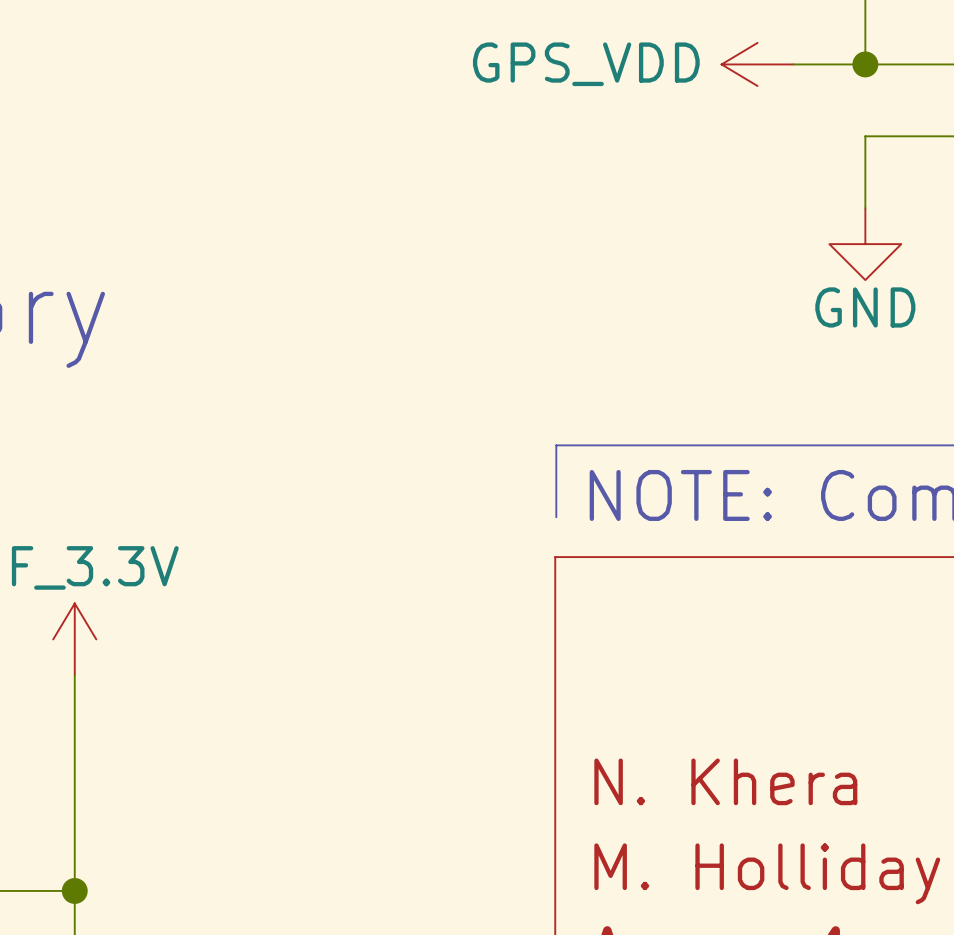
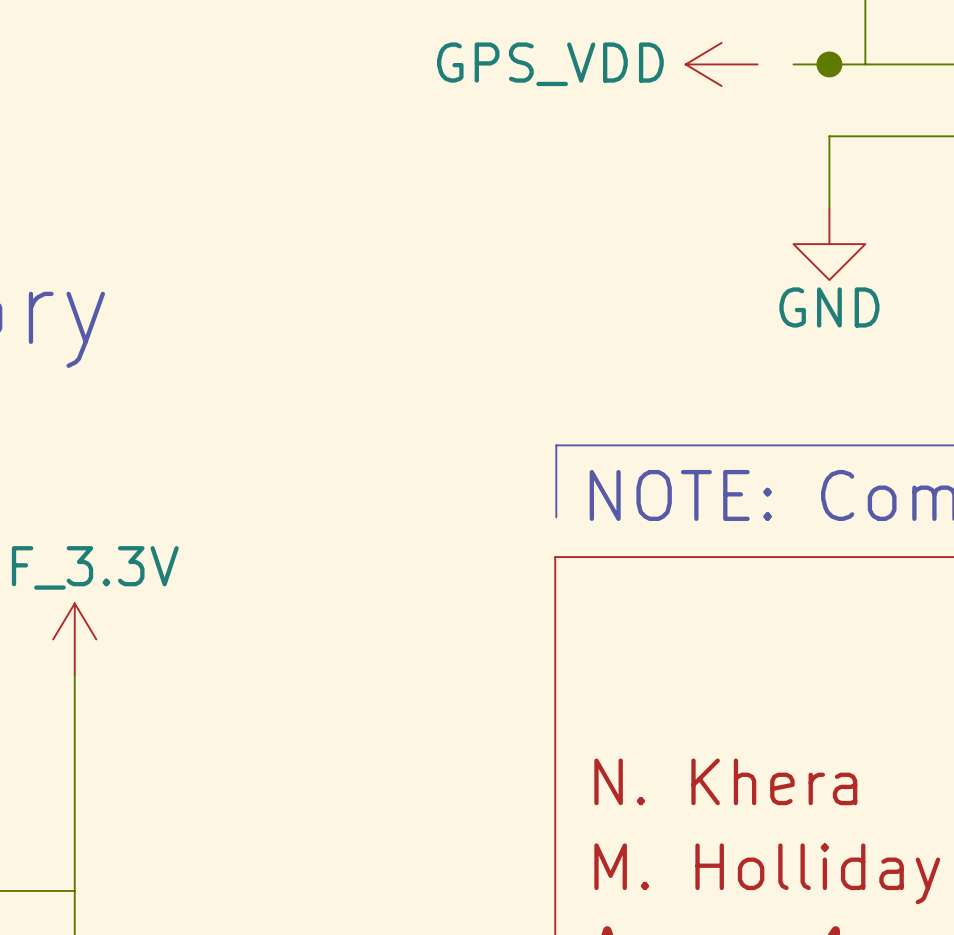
power symbol position: GPS_VDD (757, 64) -> GPS_VDD (721, 64)
junction position: (865, 64) -> (829, 64)
wire: (865, 136) (865, 208) -> (865, 136) (829, 136) (829, 208)
power symbol position: GND (865, 244) -> GND (829, 244)
junction: (74, 890) -> none

